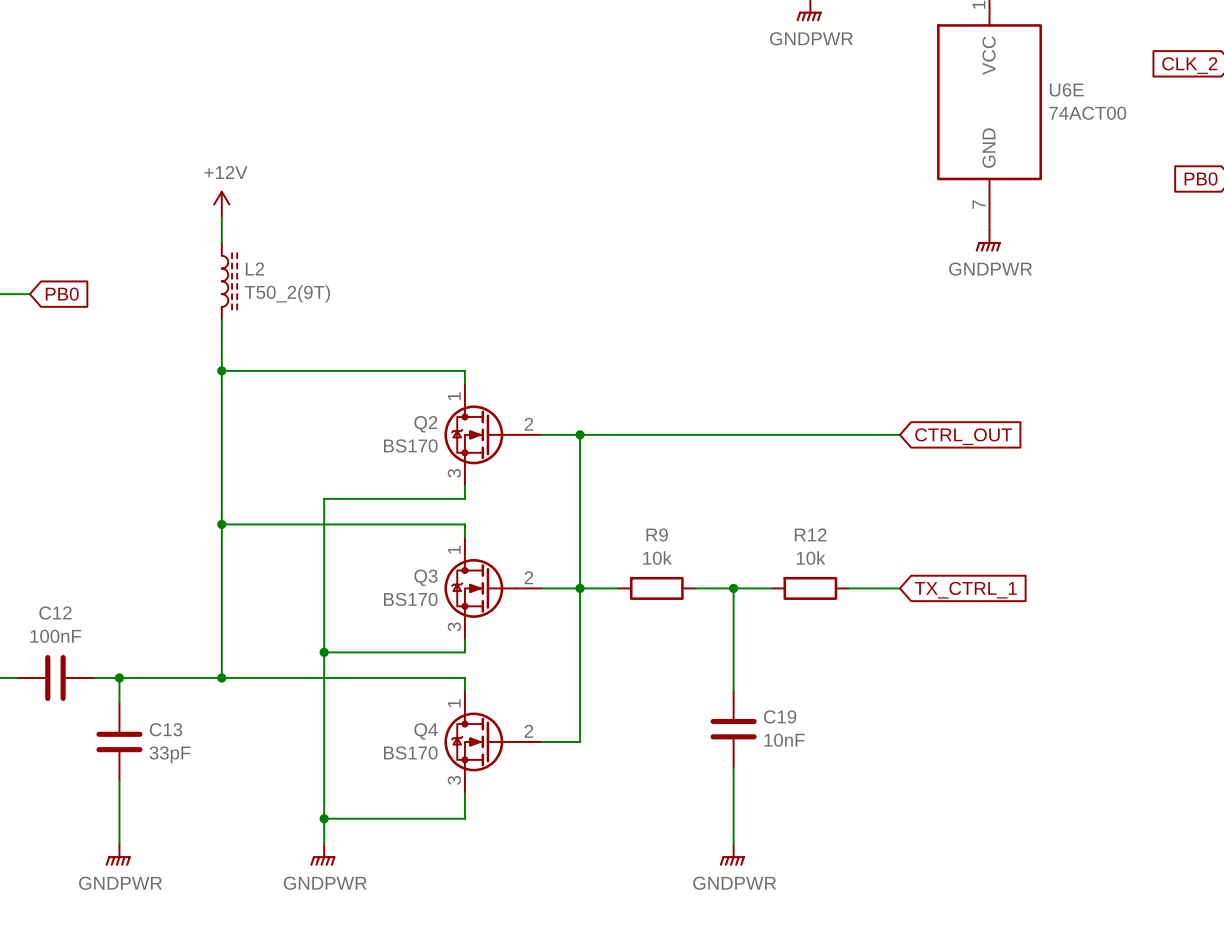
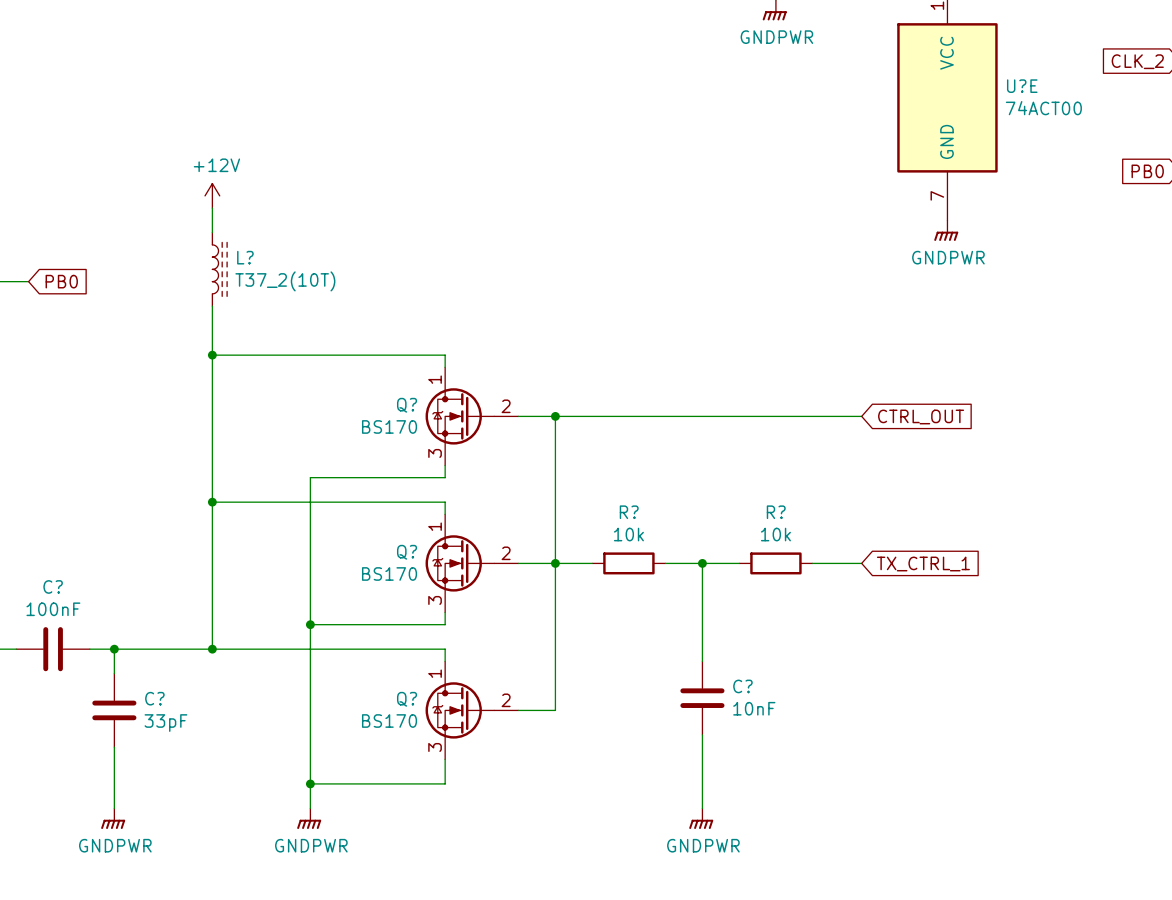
U6E name: U6E (1066, 89) -> U?E (1022, 86)
L2 name: L2 (254, 269) -> L? (245, 257)
L2 value: T50_2(9T) (287, 293) -> T37_2(10T) (285, 281)
Q2 name: Q2 (425, 424) -> Q? (407, 405)
R9 name: R9 (657, 534) -> R? (629, 512)
R12 name: R12 (810, 534) -> R? (776, 512)
Q3 name: Q3 (425, 577) -> Q? (407, 552)
C12 name: C12 (55, 613) -> C? (53, 586)
C19 name: C19 (780, 716) -> C? (742, 686)
C13 name: C13 (166, 729) -> C? (154, 698)
Q4 name: Q4 (426, 731) -> Q? (407, 699)

